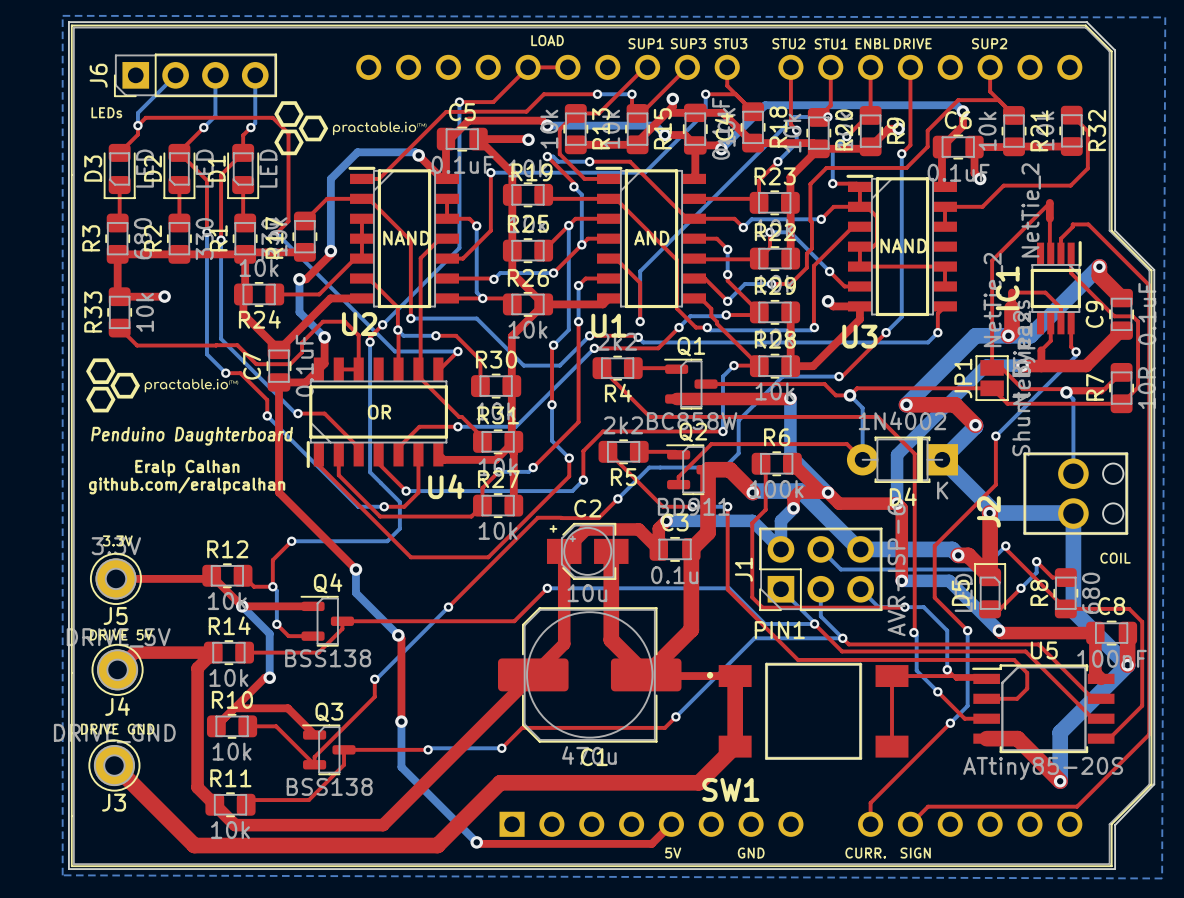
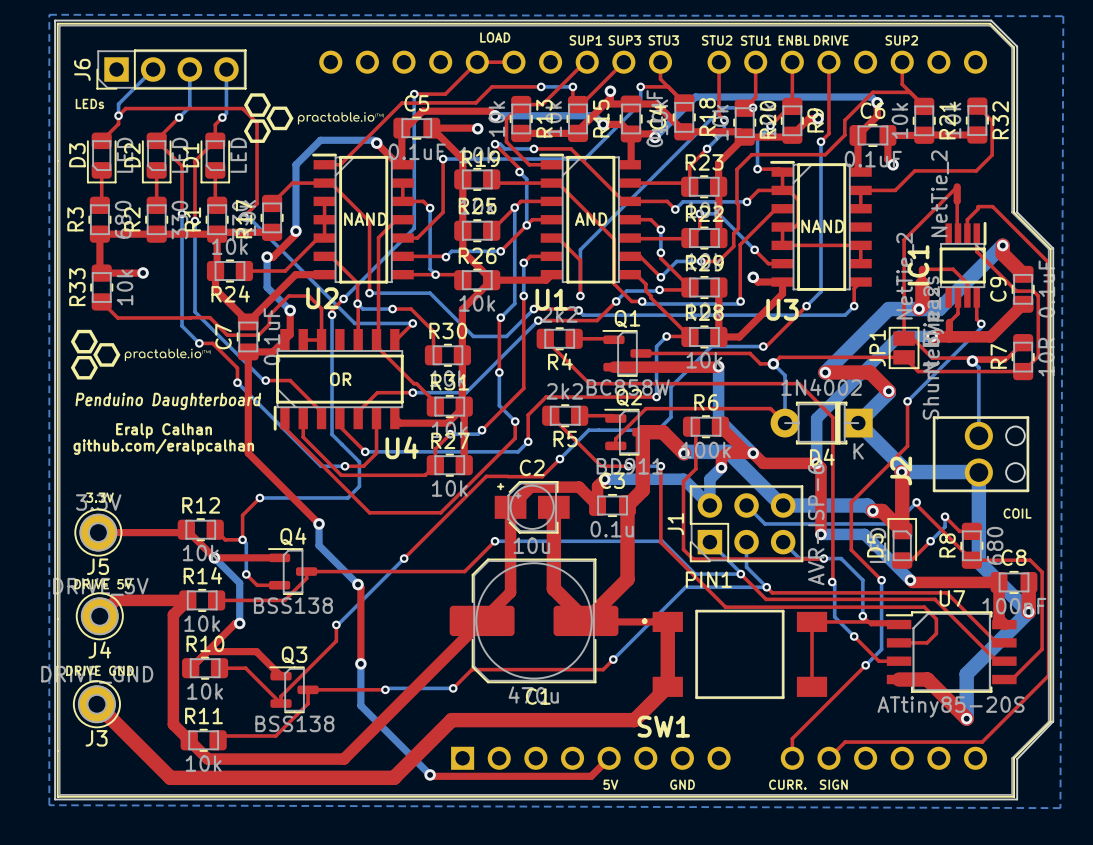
U5 name: U5 (1044, 650) -> U7 (952, 598)

